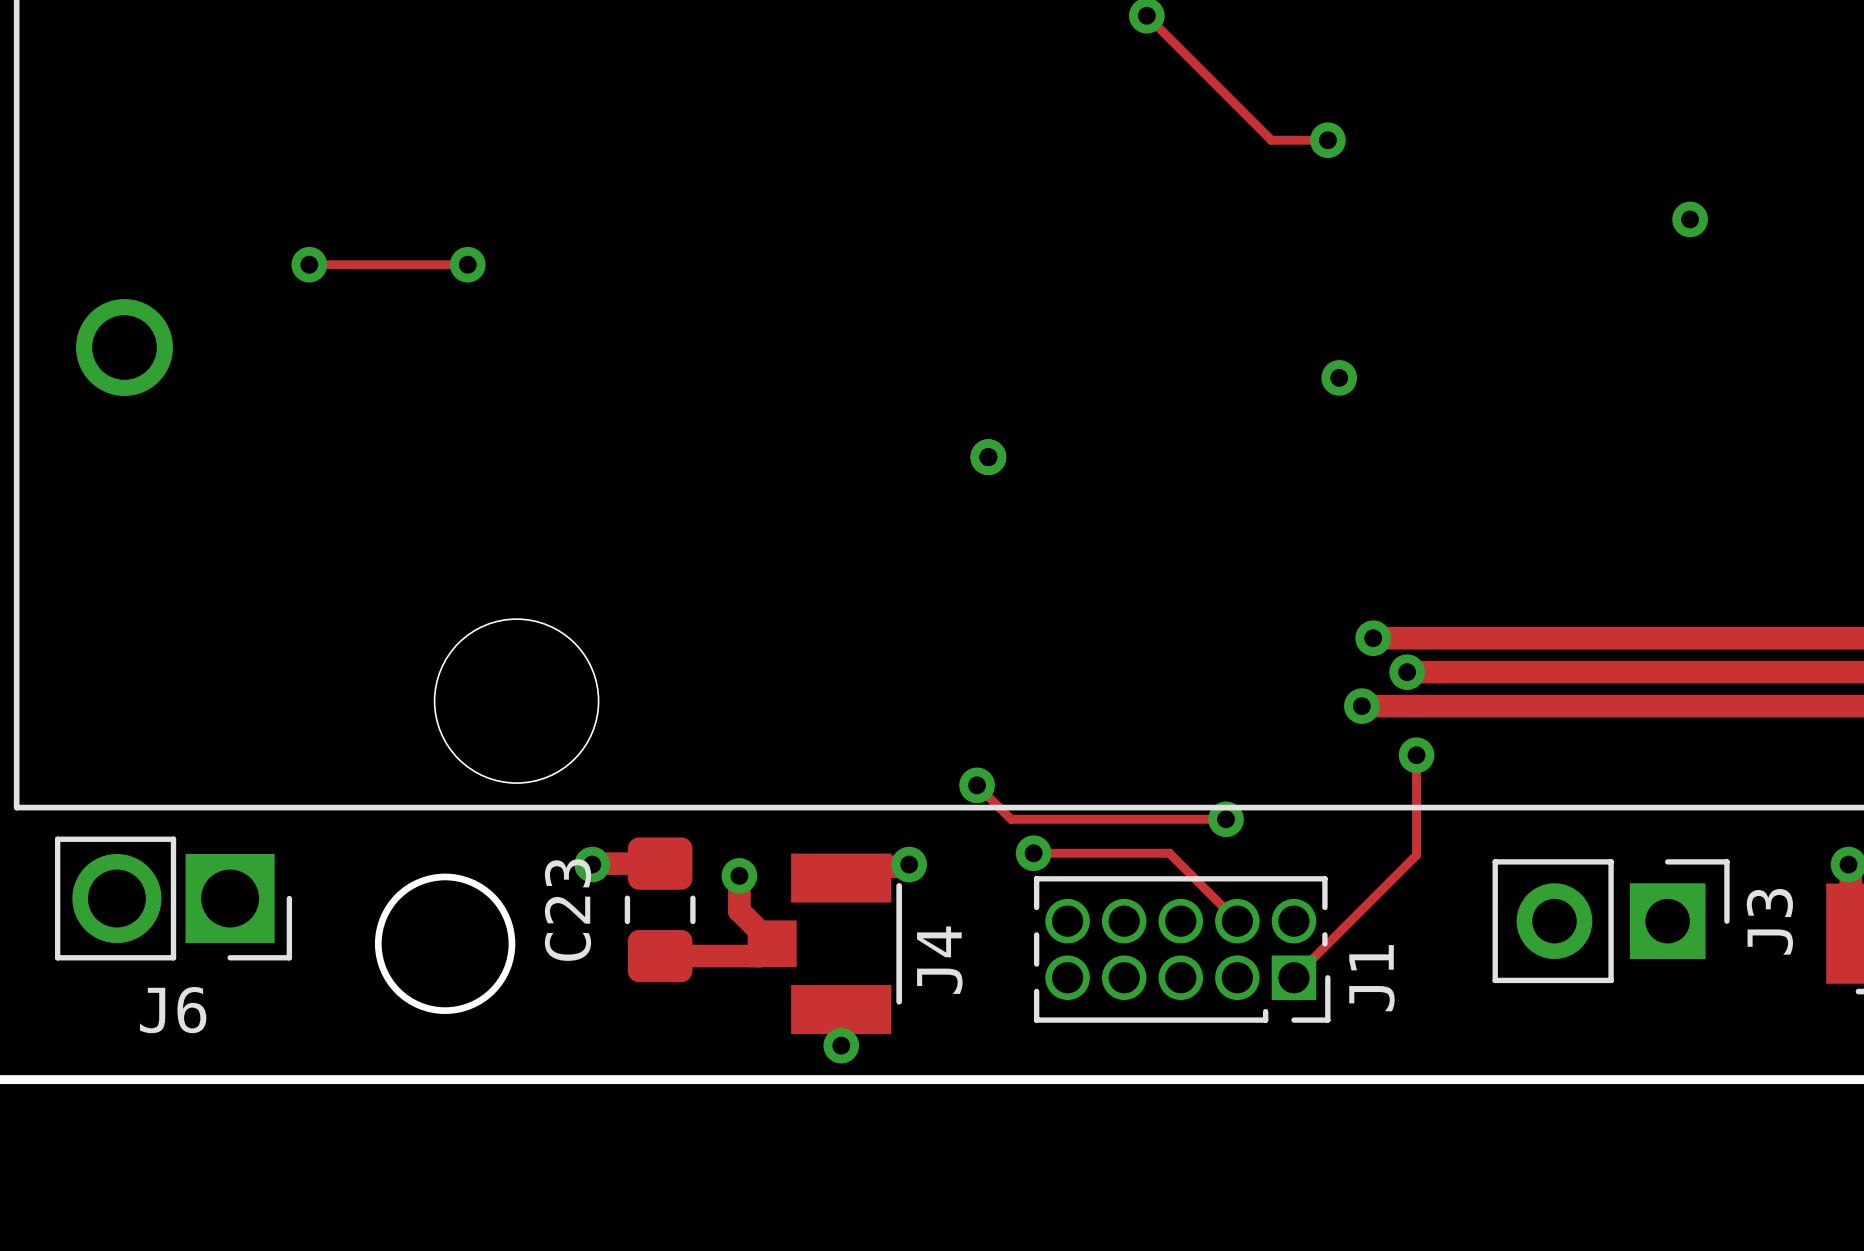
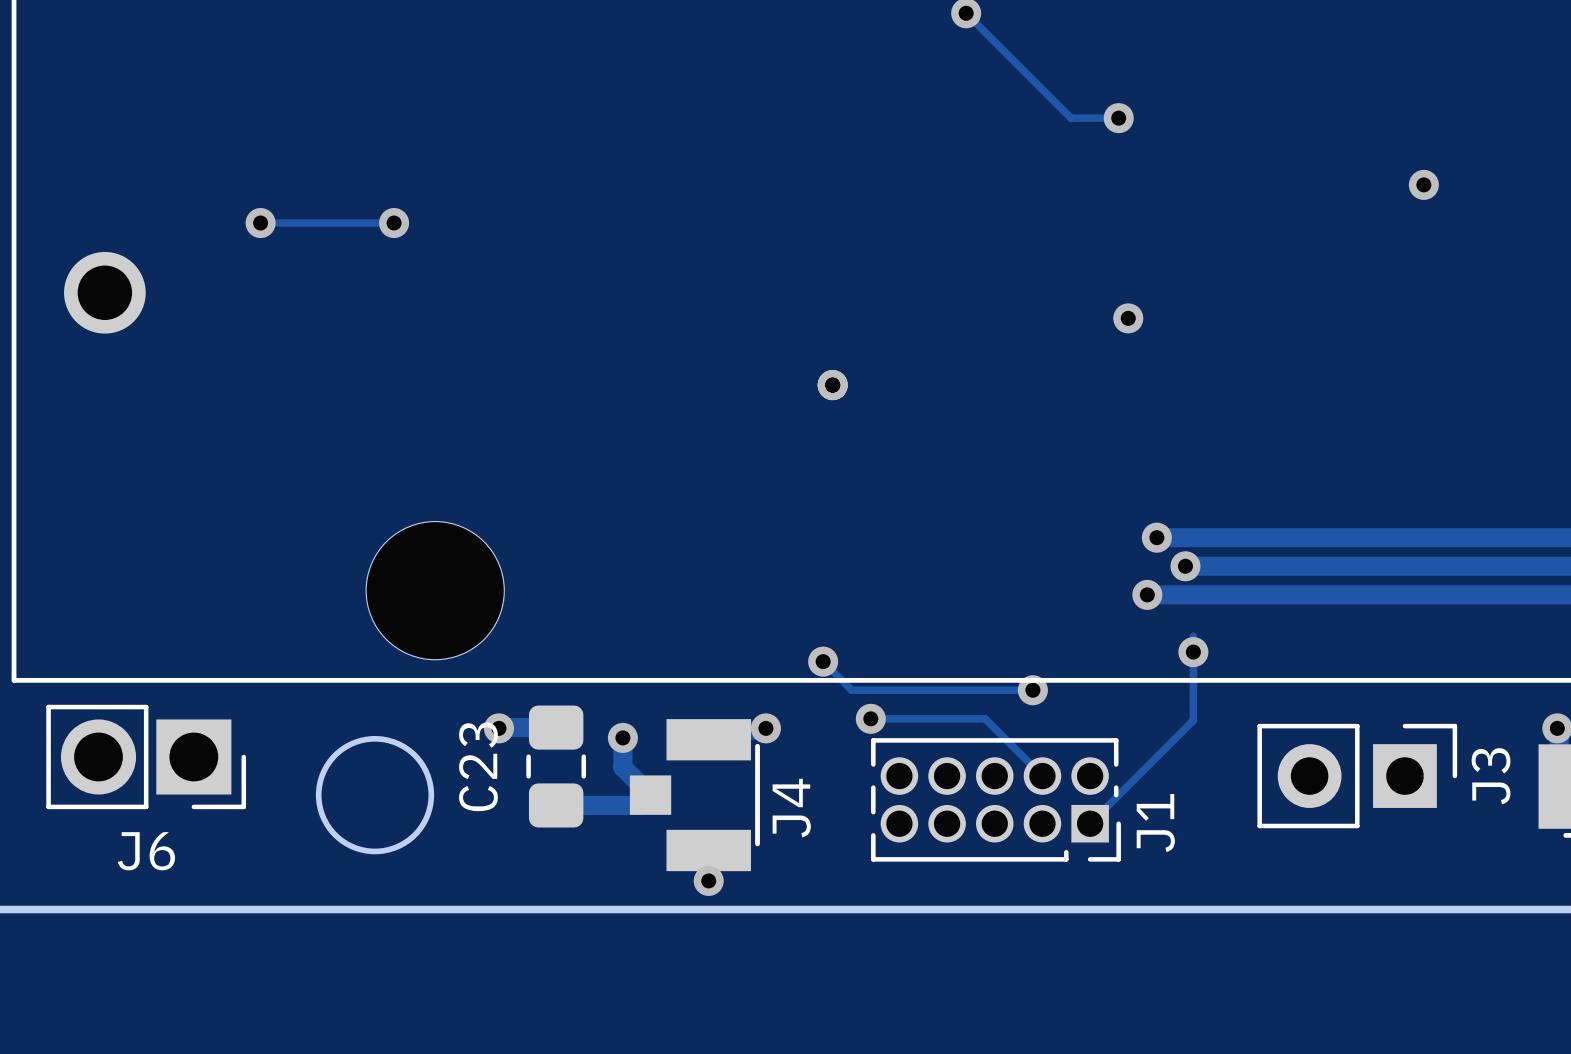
via position: (1416, 755) -> (1193, 652)

